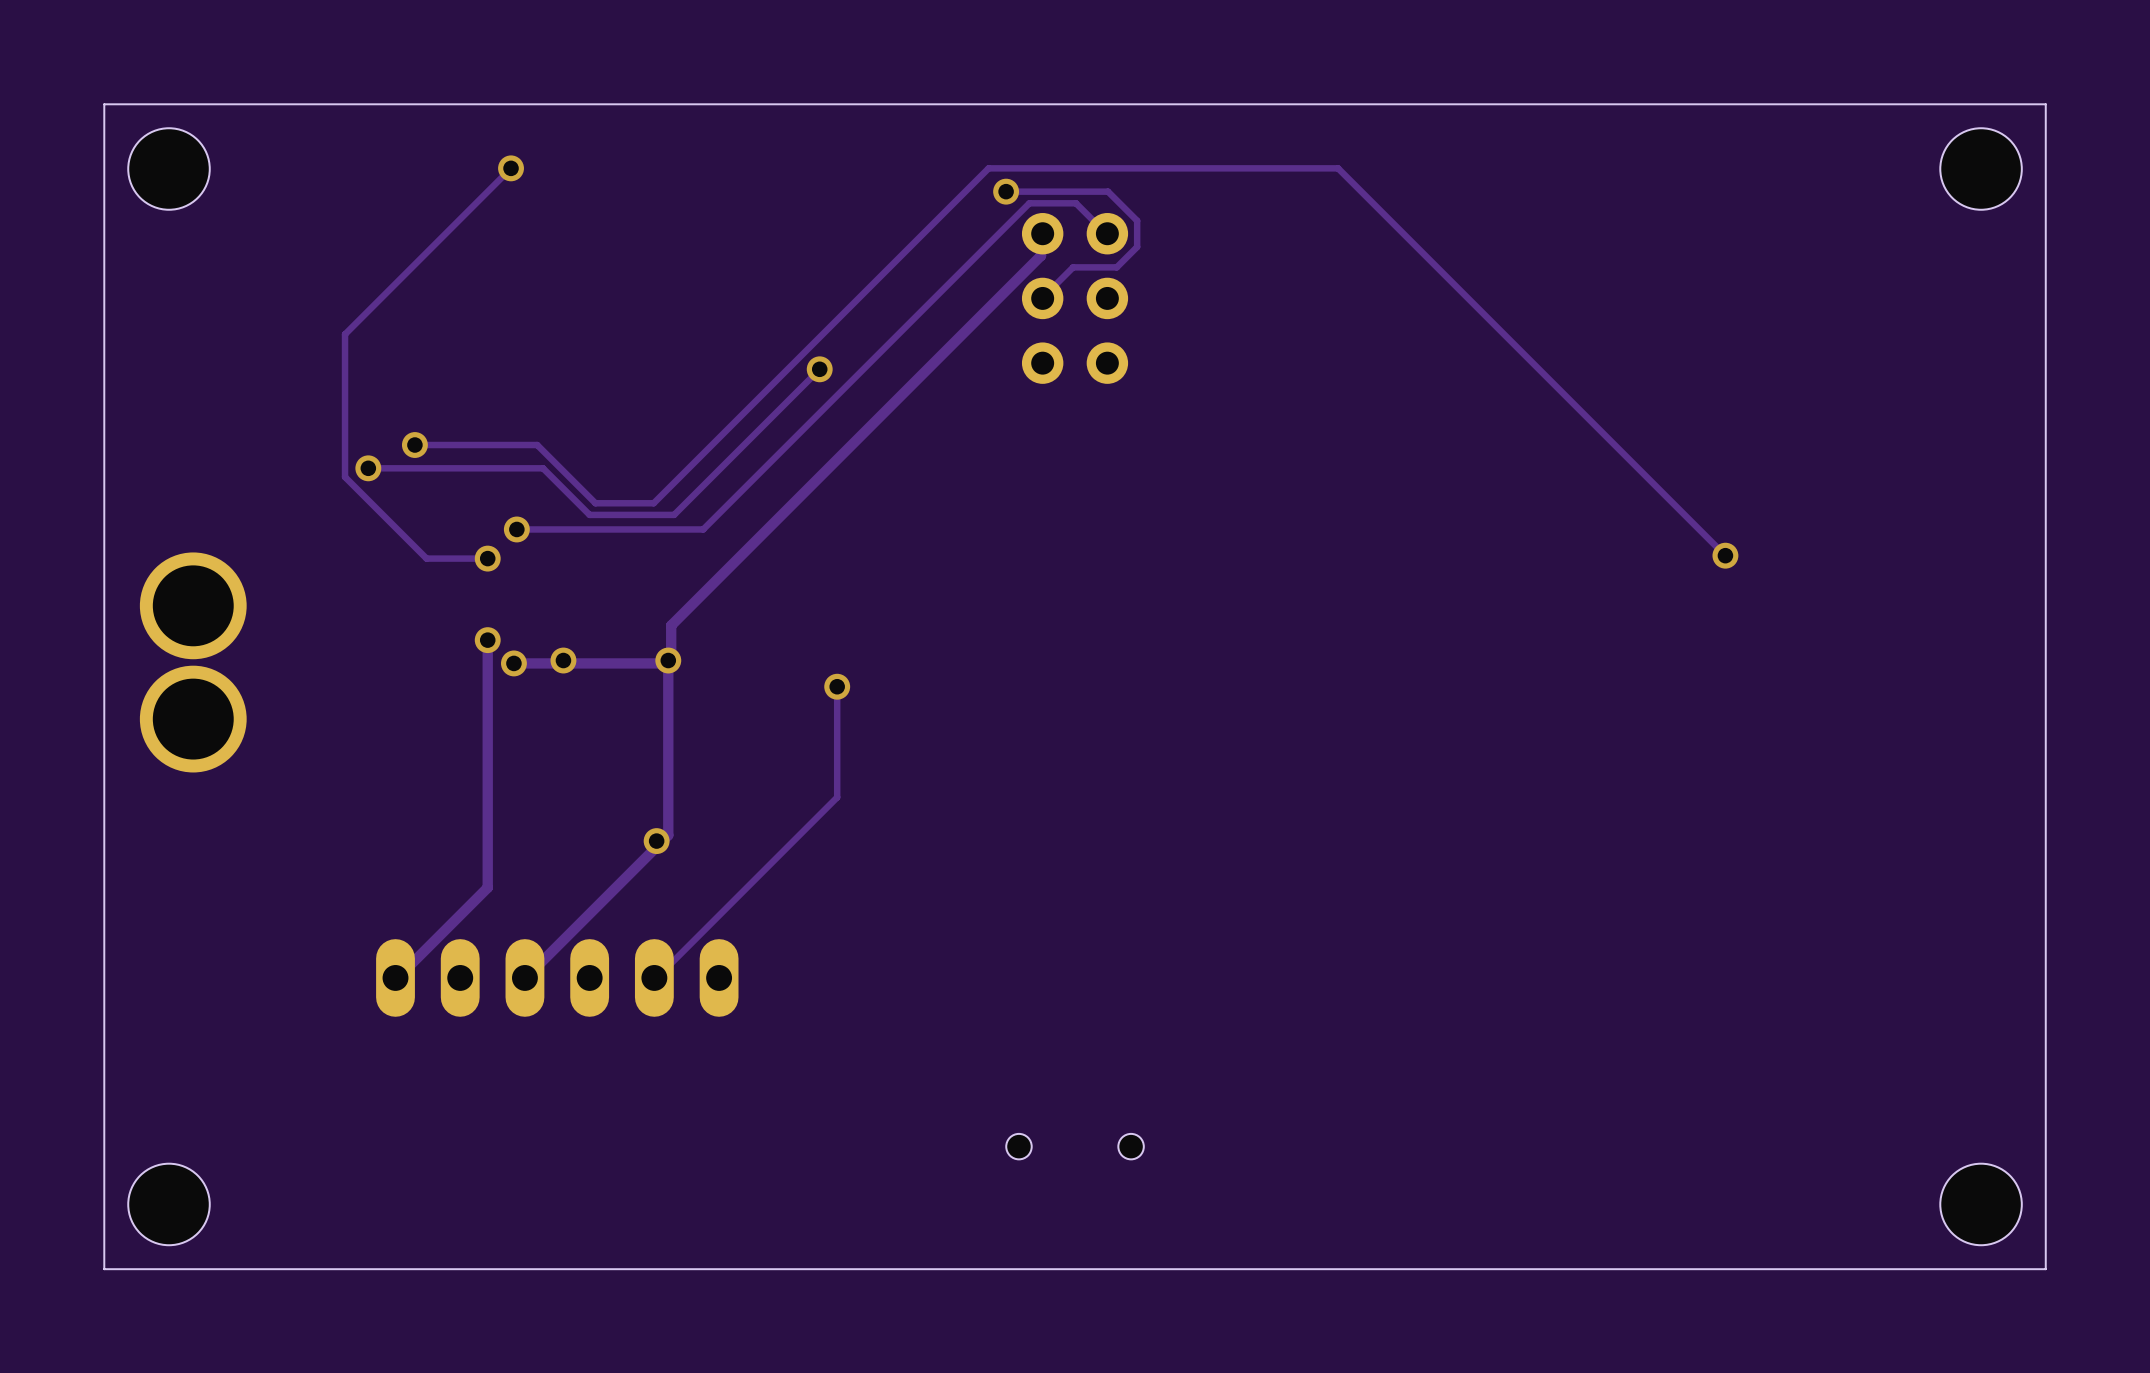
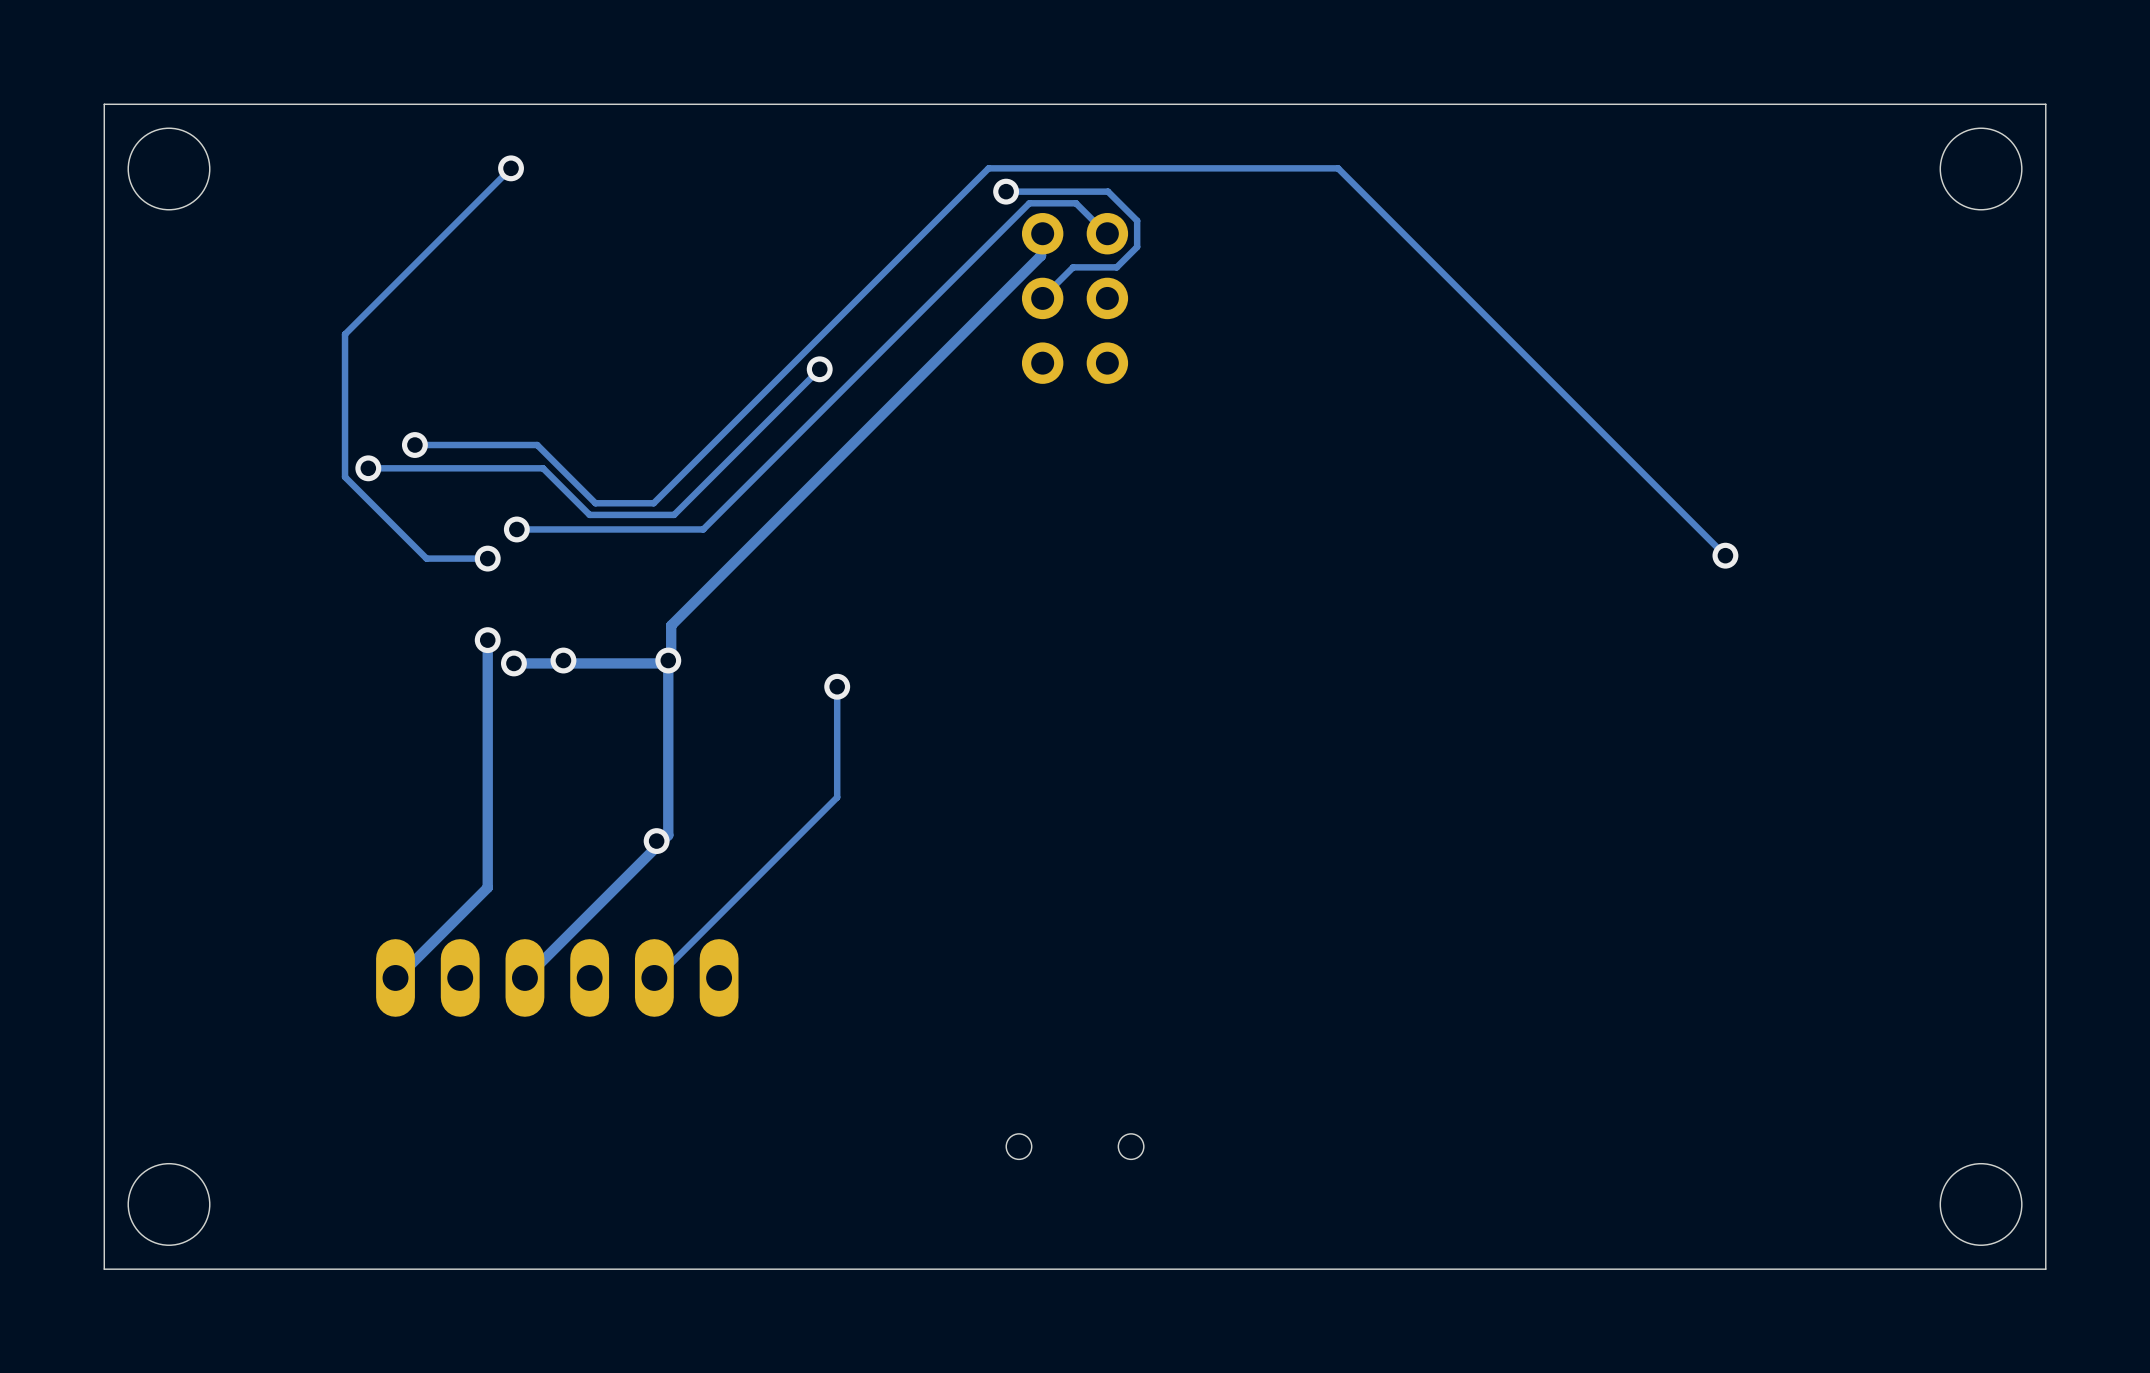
part: (193, 662) -> none

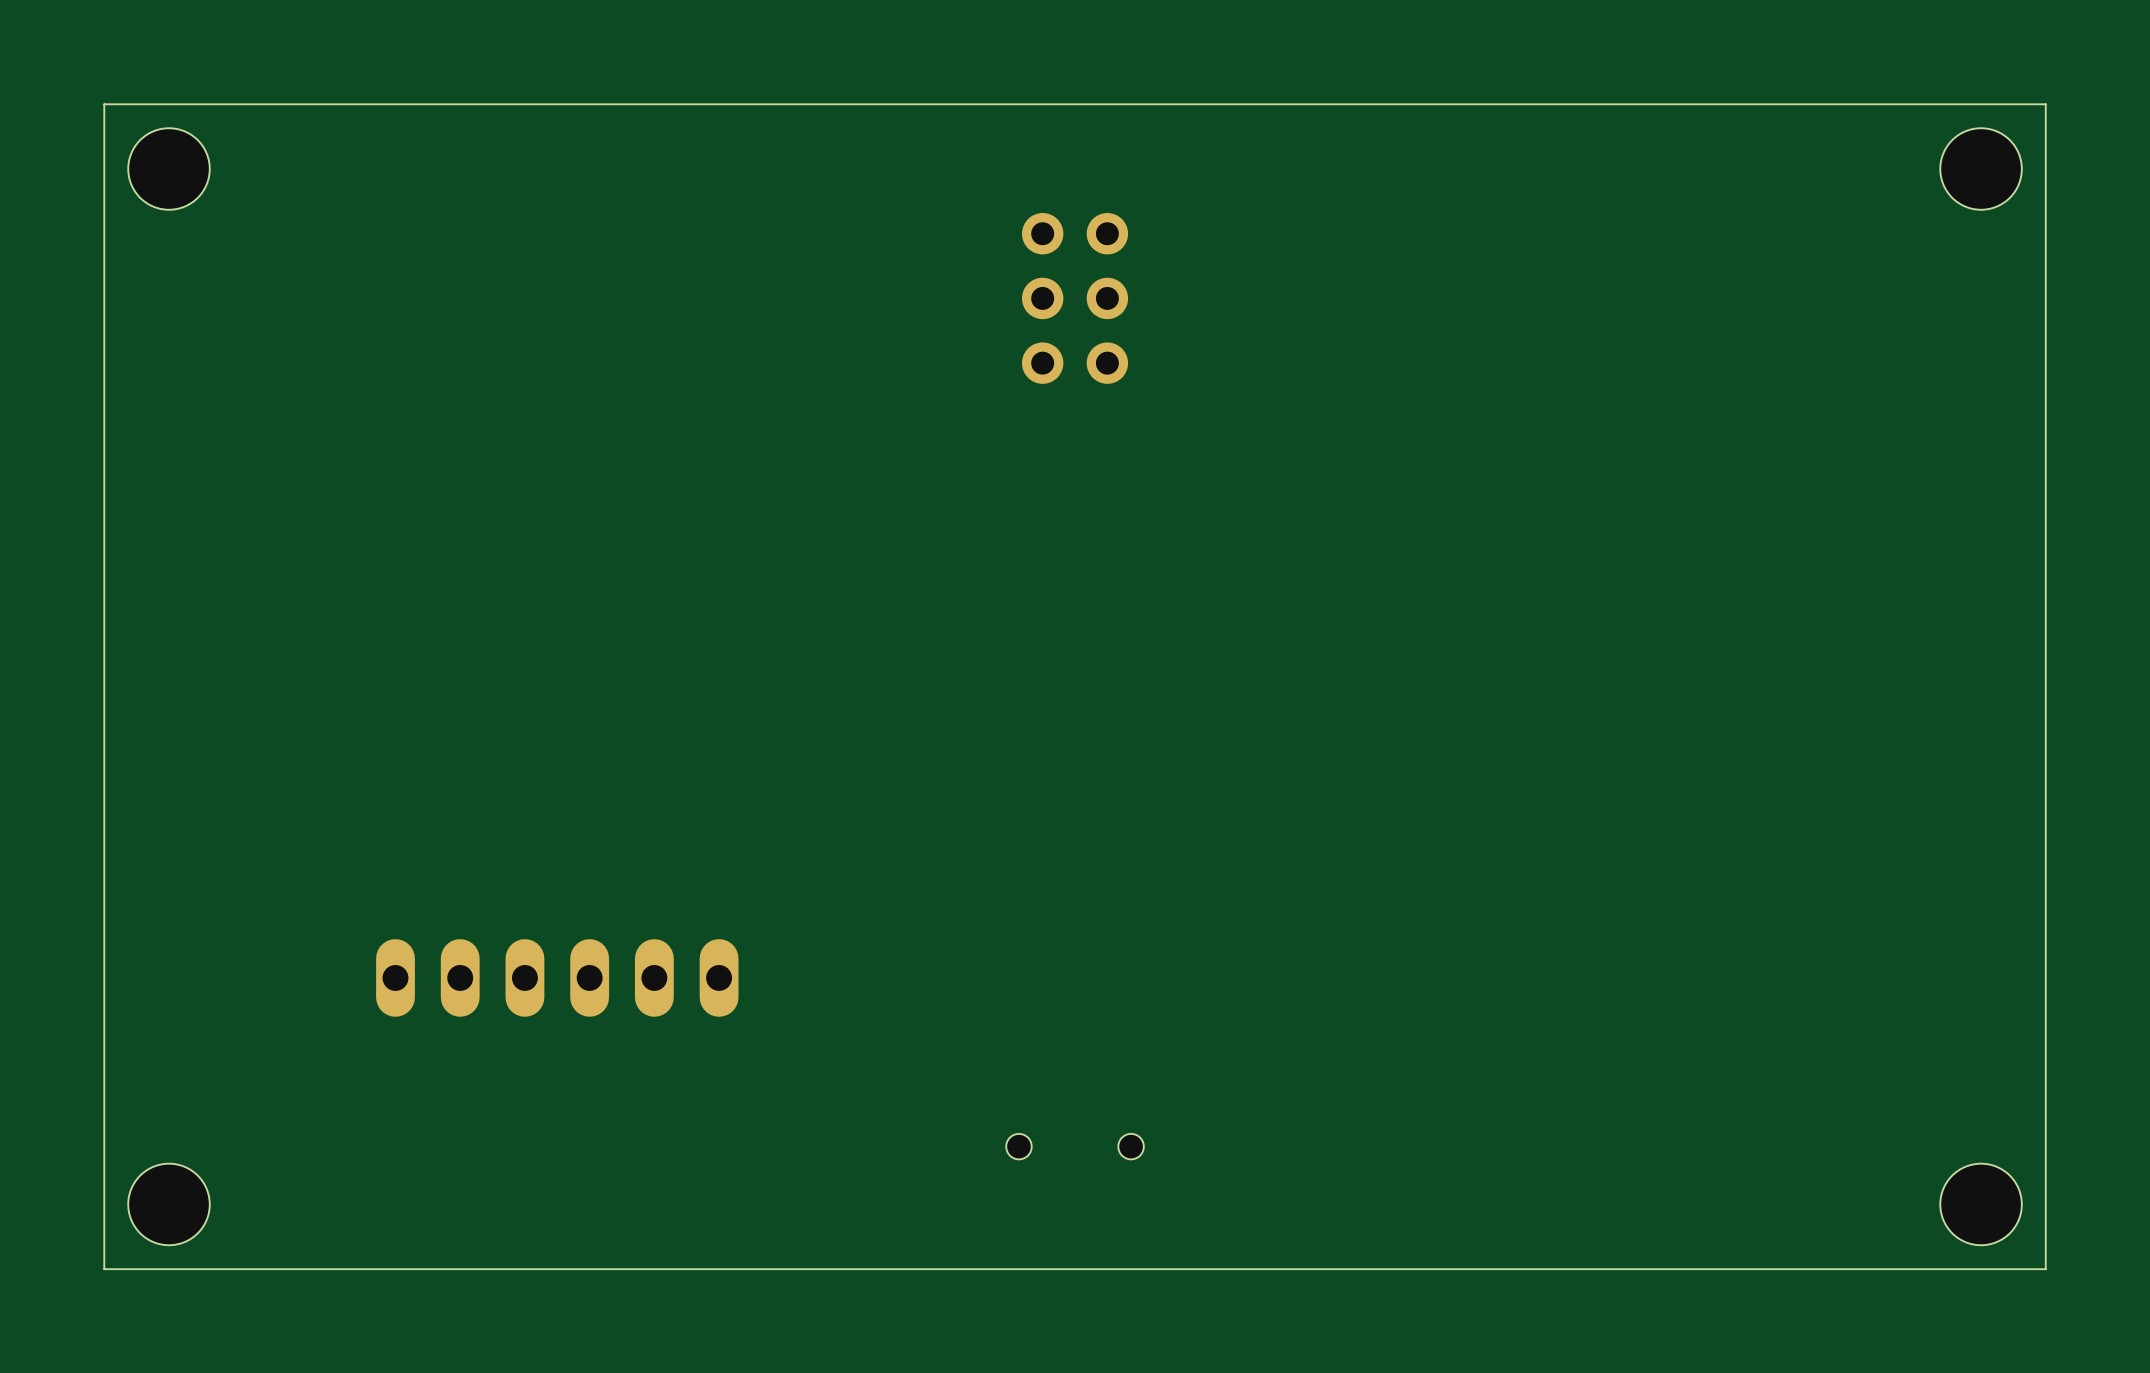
track: (511, 168) (345, 334) (345, 477) (426, 558) (487, 558) -> none
via: (511, 168) -> none
track: (1006, 191) (1108, 191) (1137, 220) (1137, 246) (1116, 267) (1073, 267) (1042, 298) -> none
via: (1006, 191) -> none
track: (1042, 233) (1041, 255) (671, 625) (671, 657) (665, 663) (513, 663) -> none
track: (1107, 233) (1076, 203) (1029, 203) (703, 529) (516, 529) -> none
track: (819, 369) (674, 514) (589, 514) (543, 468) (368, 468) -> none
via: (819, 369) -> none
track: (414, 445) (537, 445) (595, 503) (653, 503) (988, 168) (1338, 168) (1725, 555) -> none
via: (414, 445) -> none
via: (368, 468) -> none
via: (516, 529) -> none
via: (1725, 555) -> none
via: (487, 558) -> none
track: (487, 640) (487, 887) (395, 977) -> none
via: (487, 640) -> none
via: (563, 660) -> none
track: (668, 660) (668, 835) (524, 977) -> none
via: (668, 660) -> none
via: (513, 663) -> none
track: (837, 686) (837, 797) (656, 977) (654, 977) -> none
via: (837, 686) -> none
via: (656, 841) -> none

